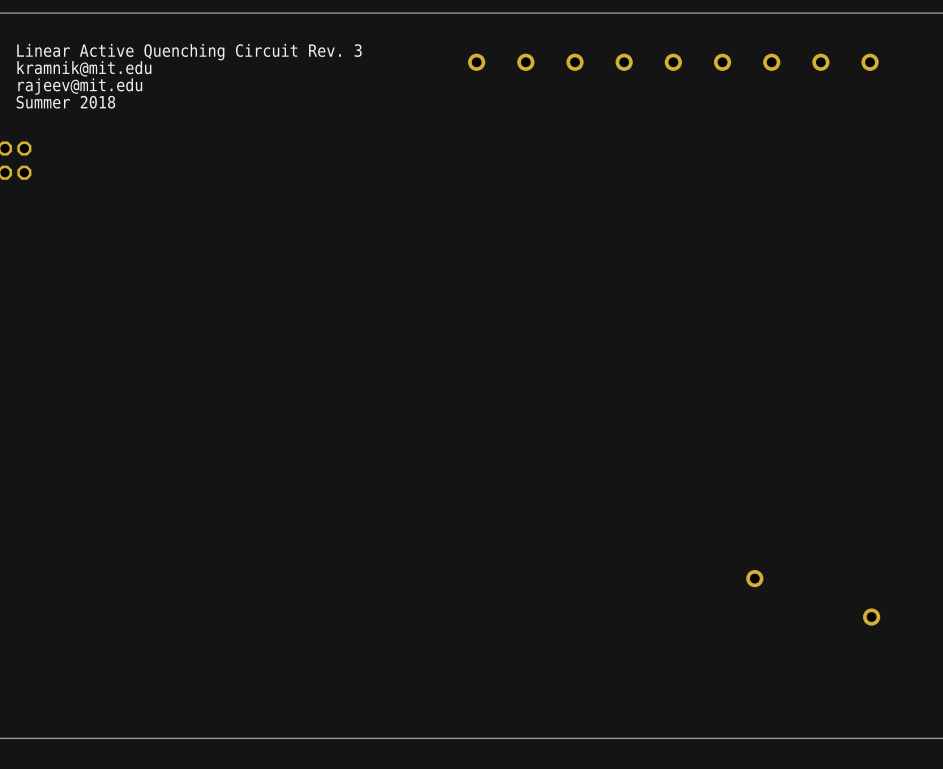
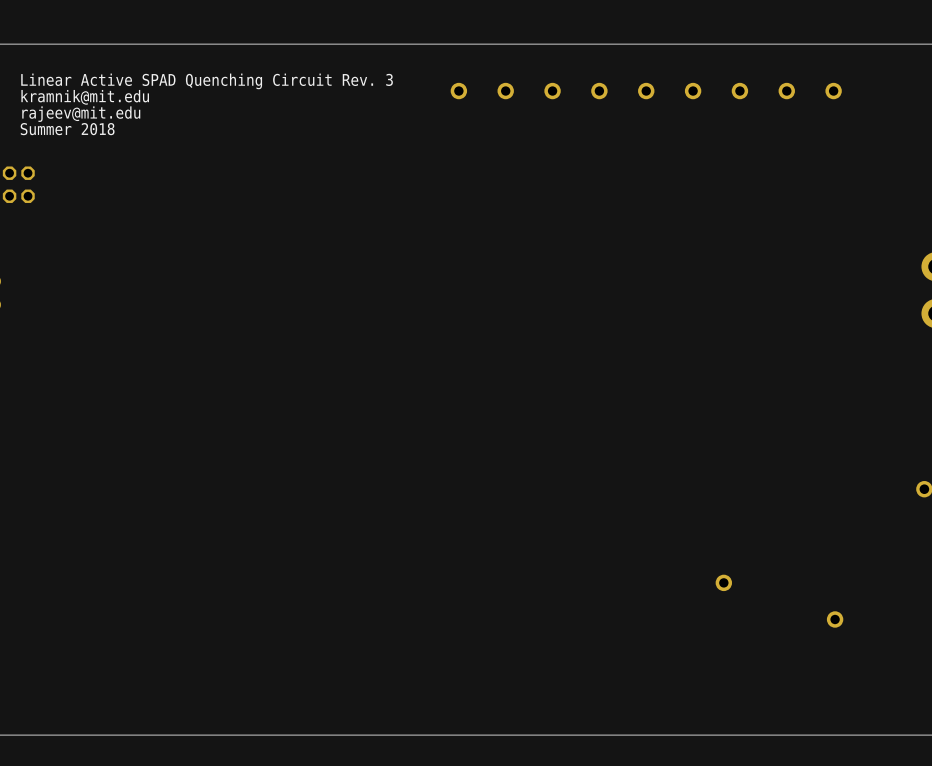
text: Linear Active Quenching Circuit Rev. 3 (189, 52) -> Linear Active SPAD Quenching Circuit Rev. 3 (207, 81)

